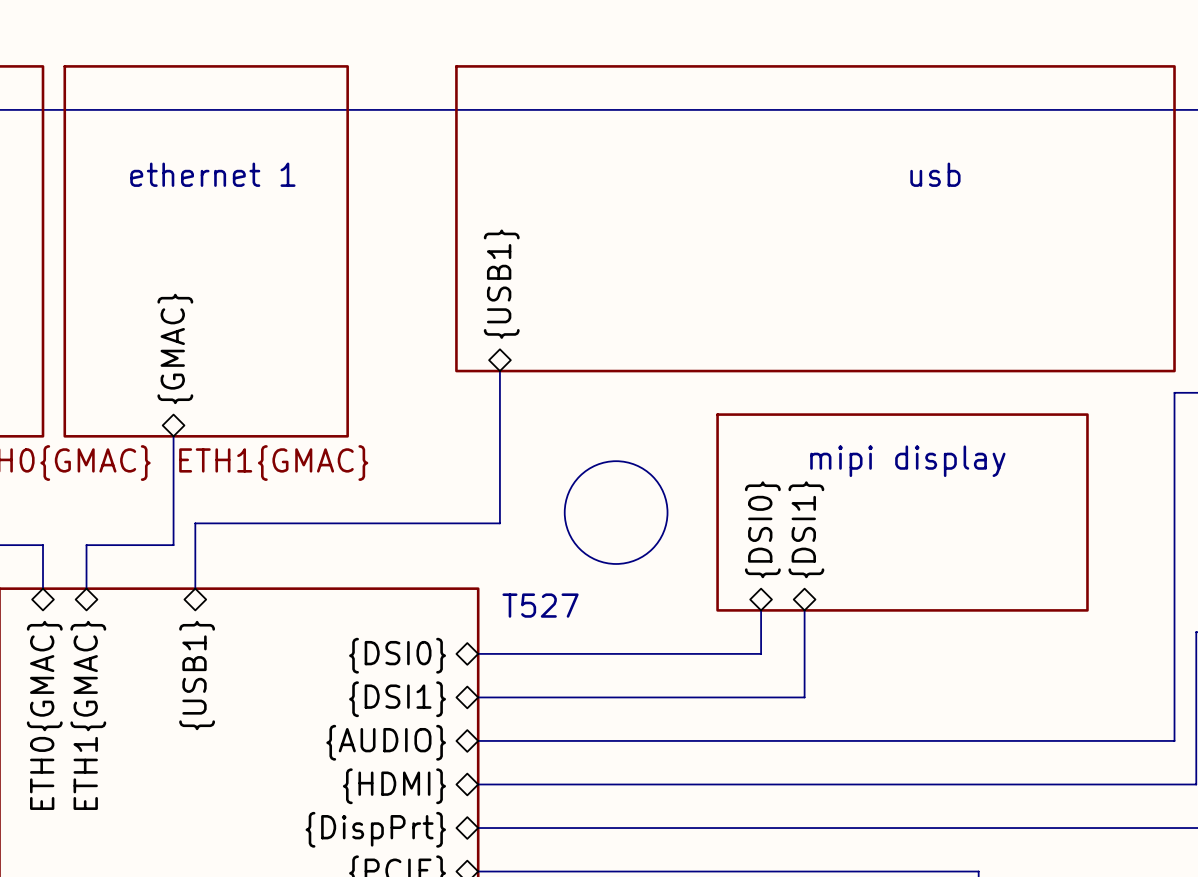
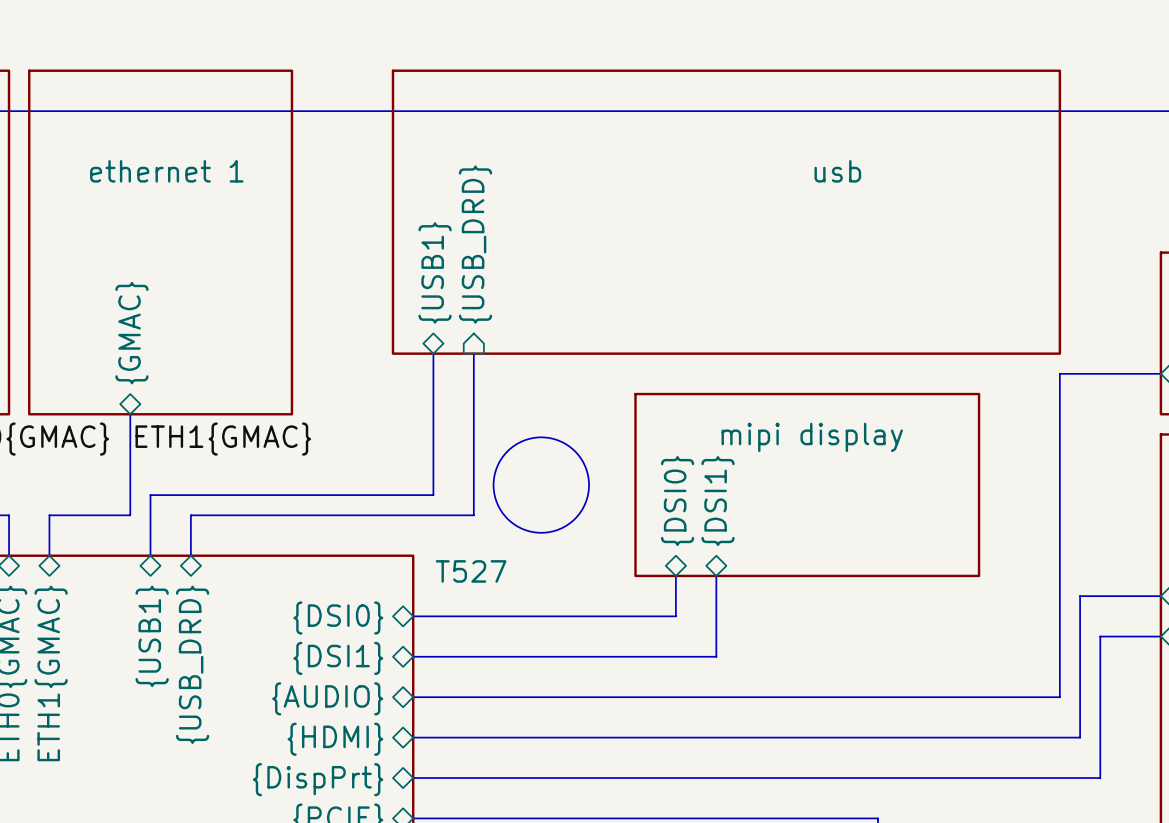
sheet pin: none -> {USB_DRD} (475, 244)
bus: none -> (473, 353) (473, 515) (190, 515) (190, 555)
sheet pin: none -> {USB_DRD} (192, 664)

